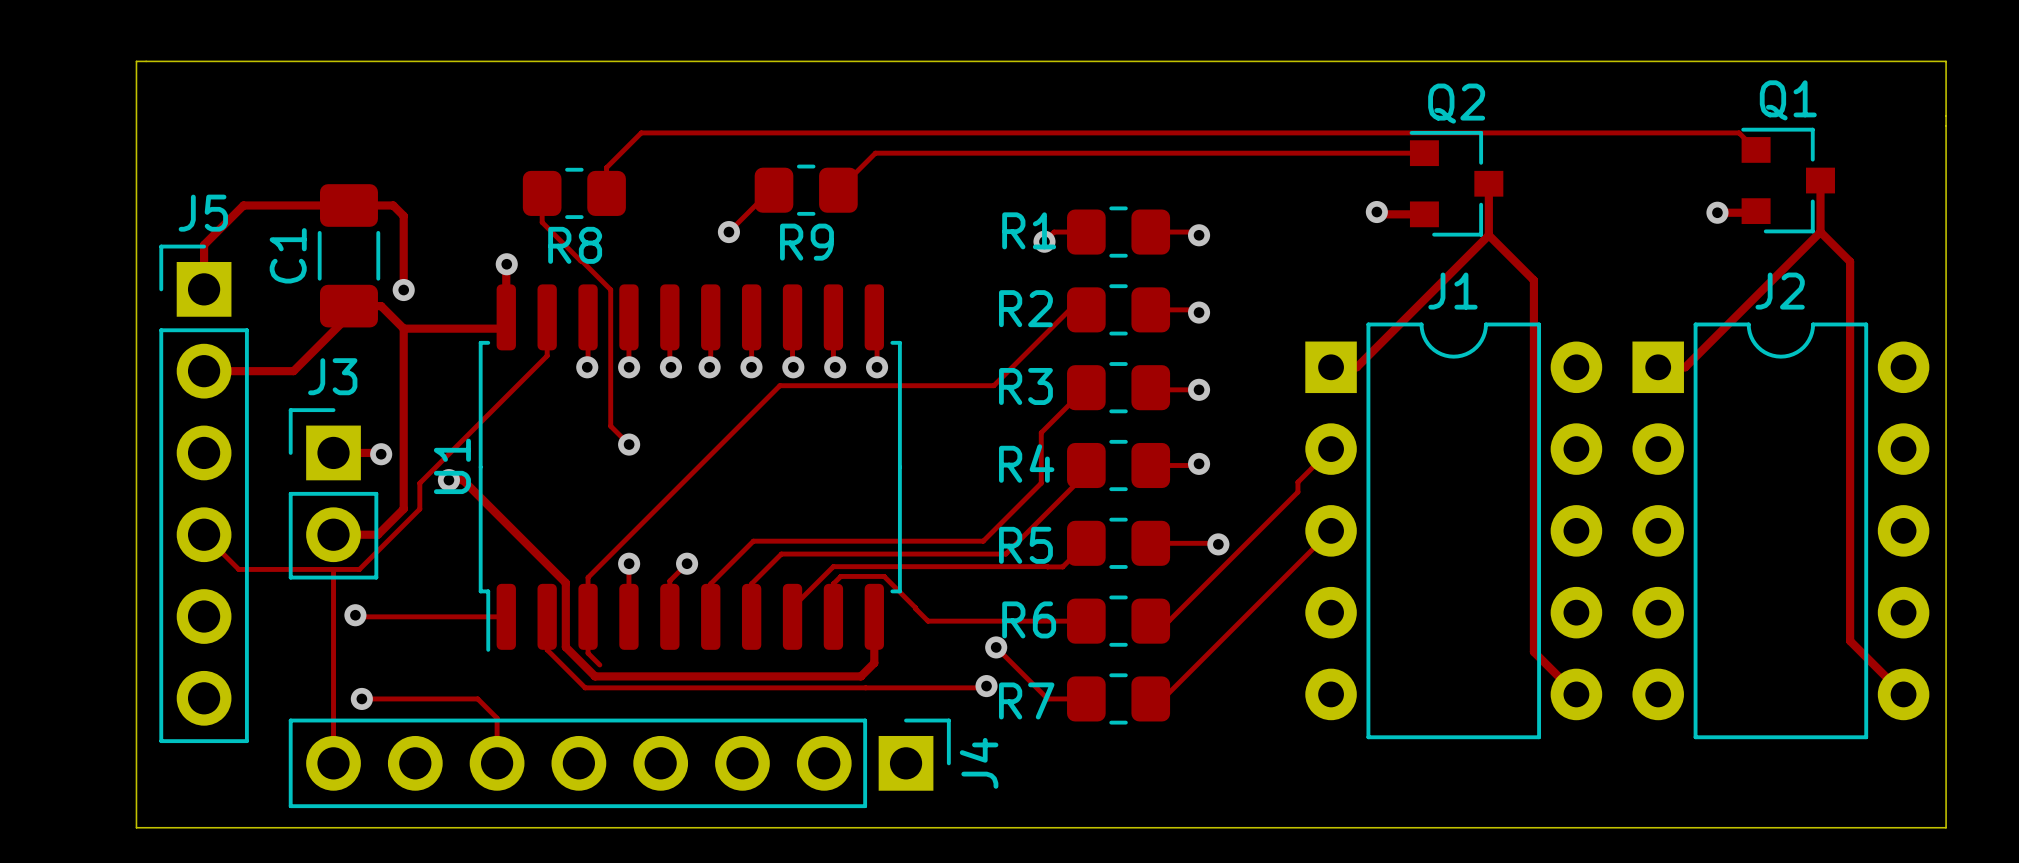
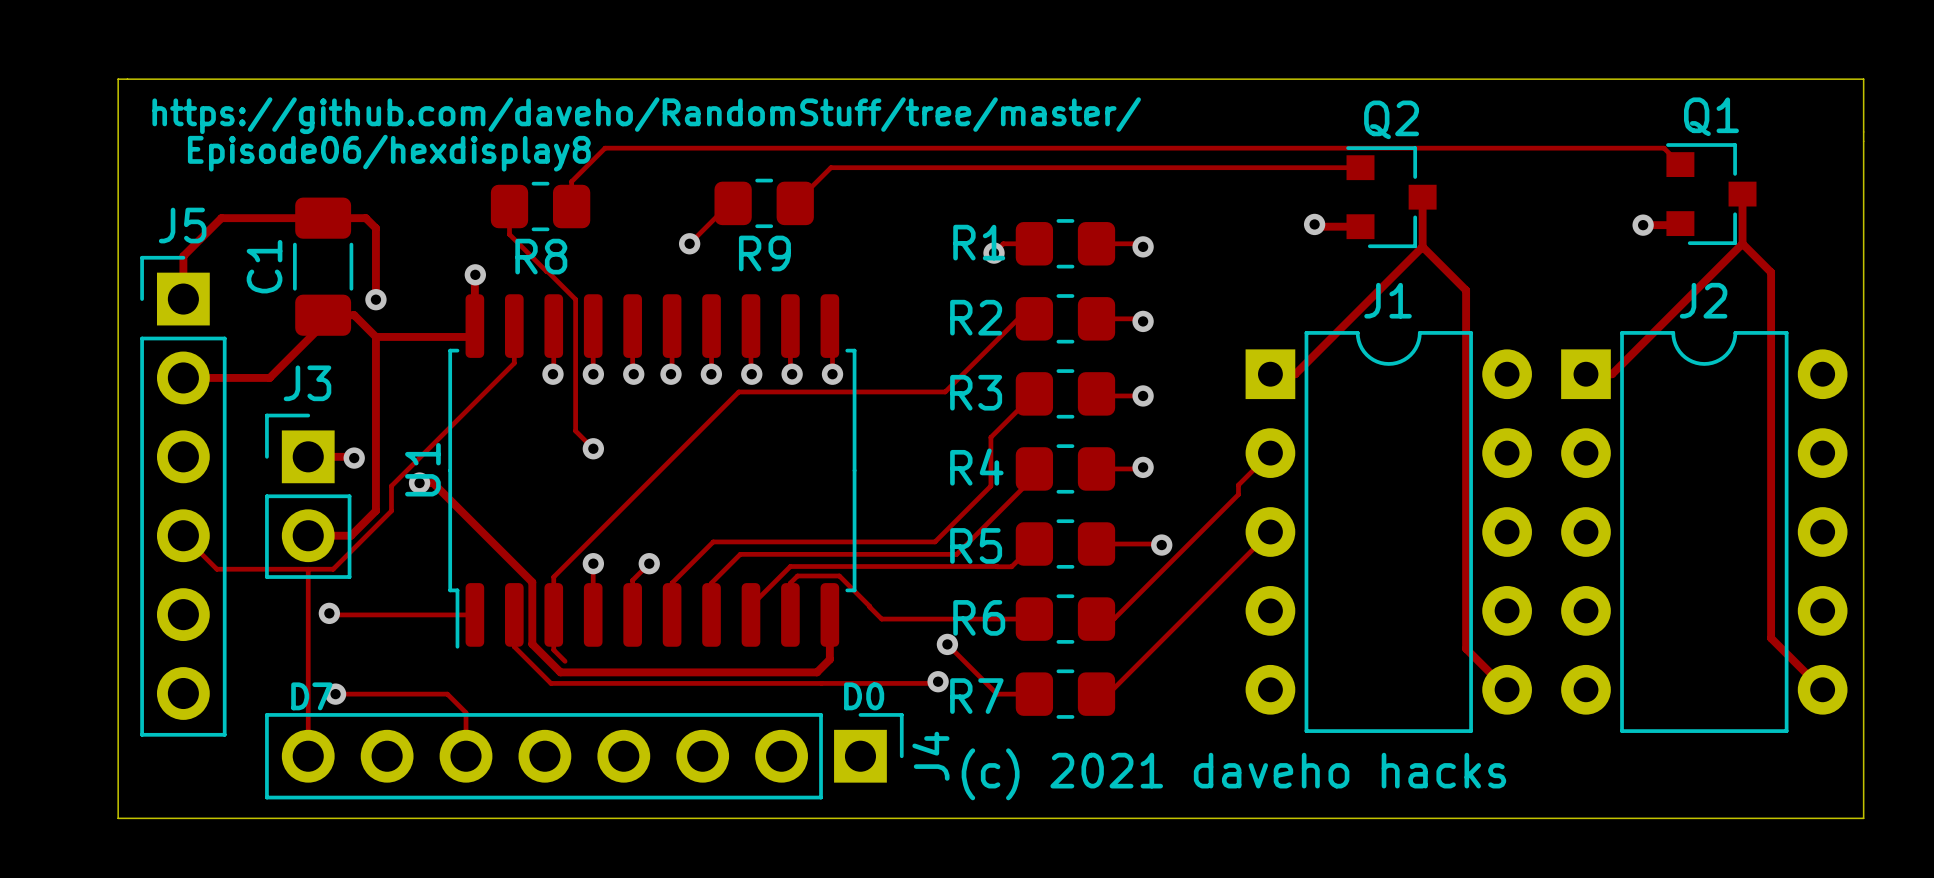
text: none -> https://github.com/daveho/RandomStuff/tree/master/ (646, 115)
text: none -> Episode06/hexdisplay8 (389, 153)
text: none -> D7 (311, 696)
text: none -> D0 (864, 696)
text: none -> (c) 2021 daveho hacks (1233, 774)

